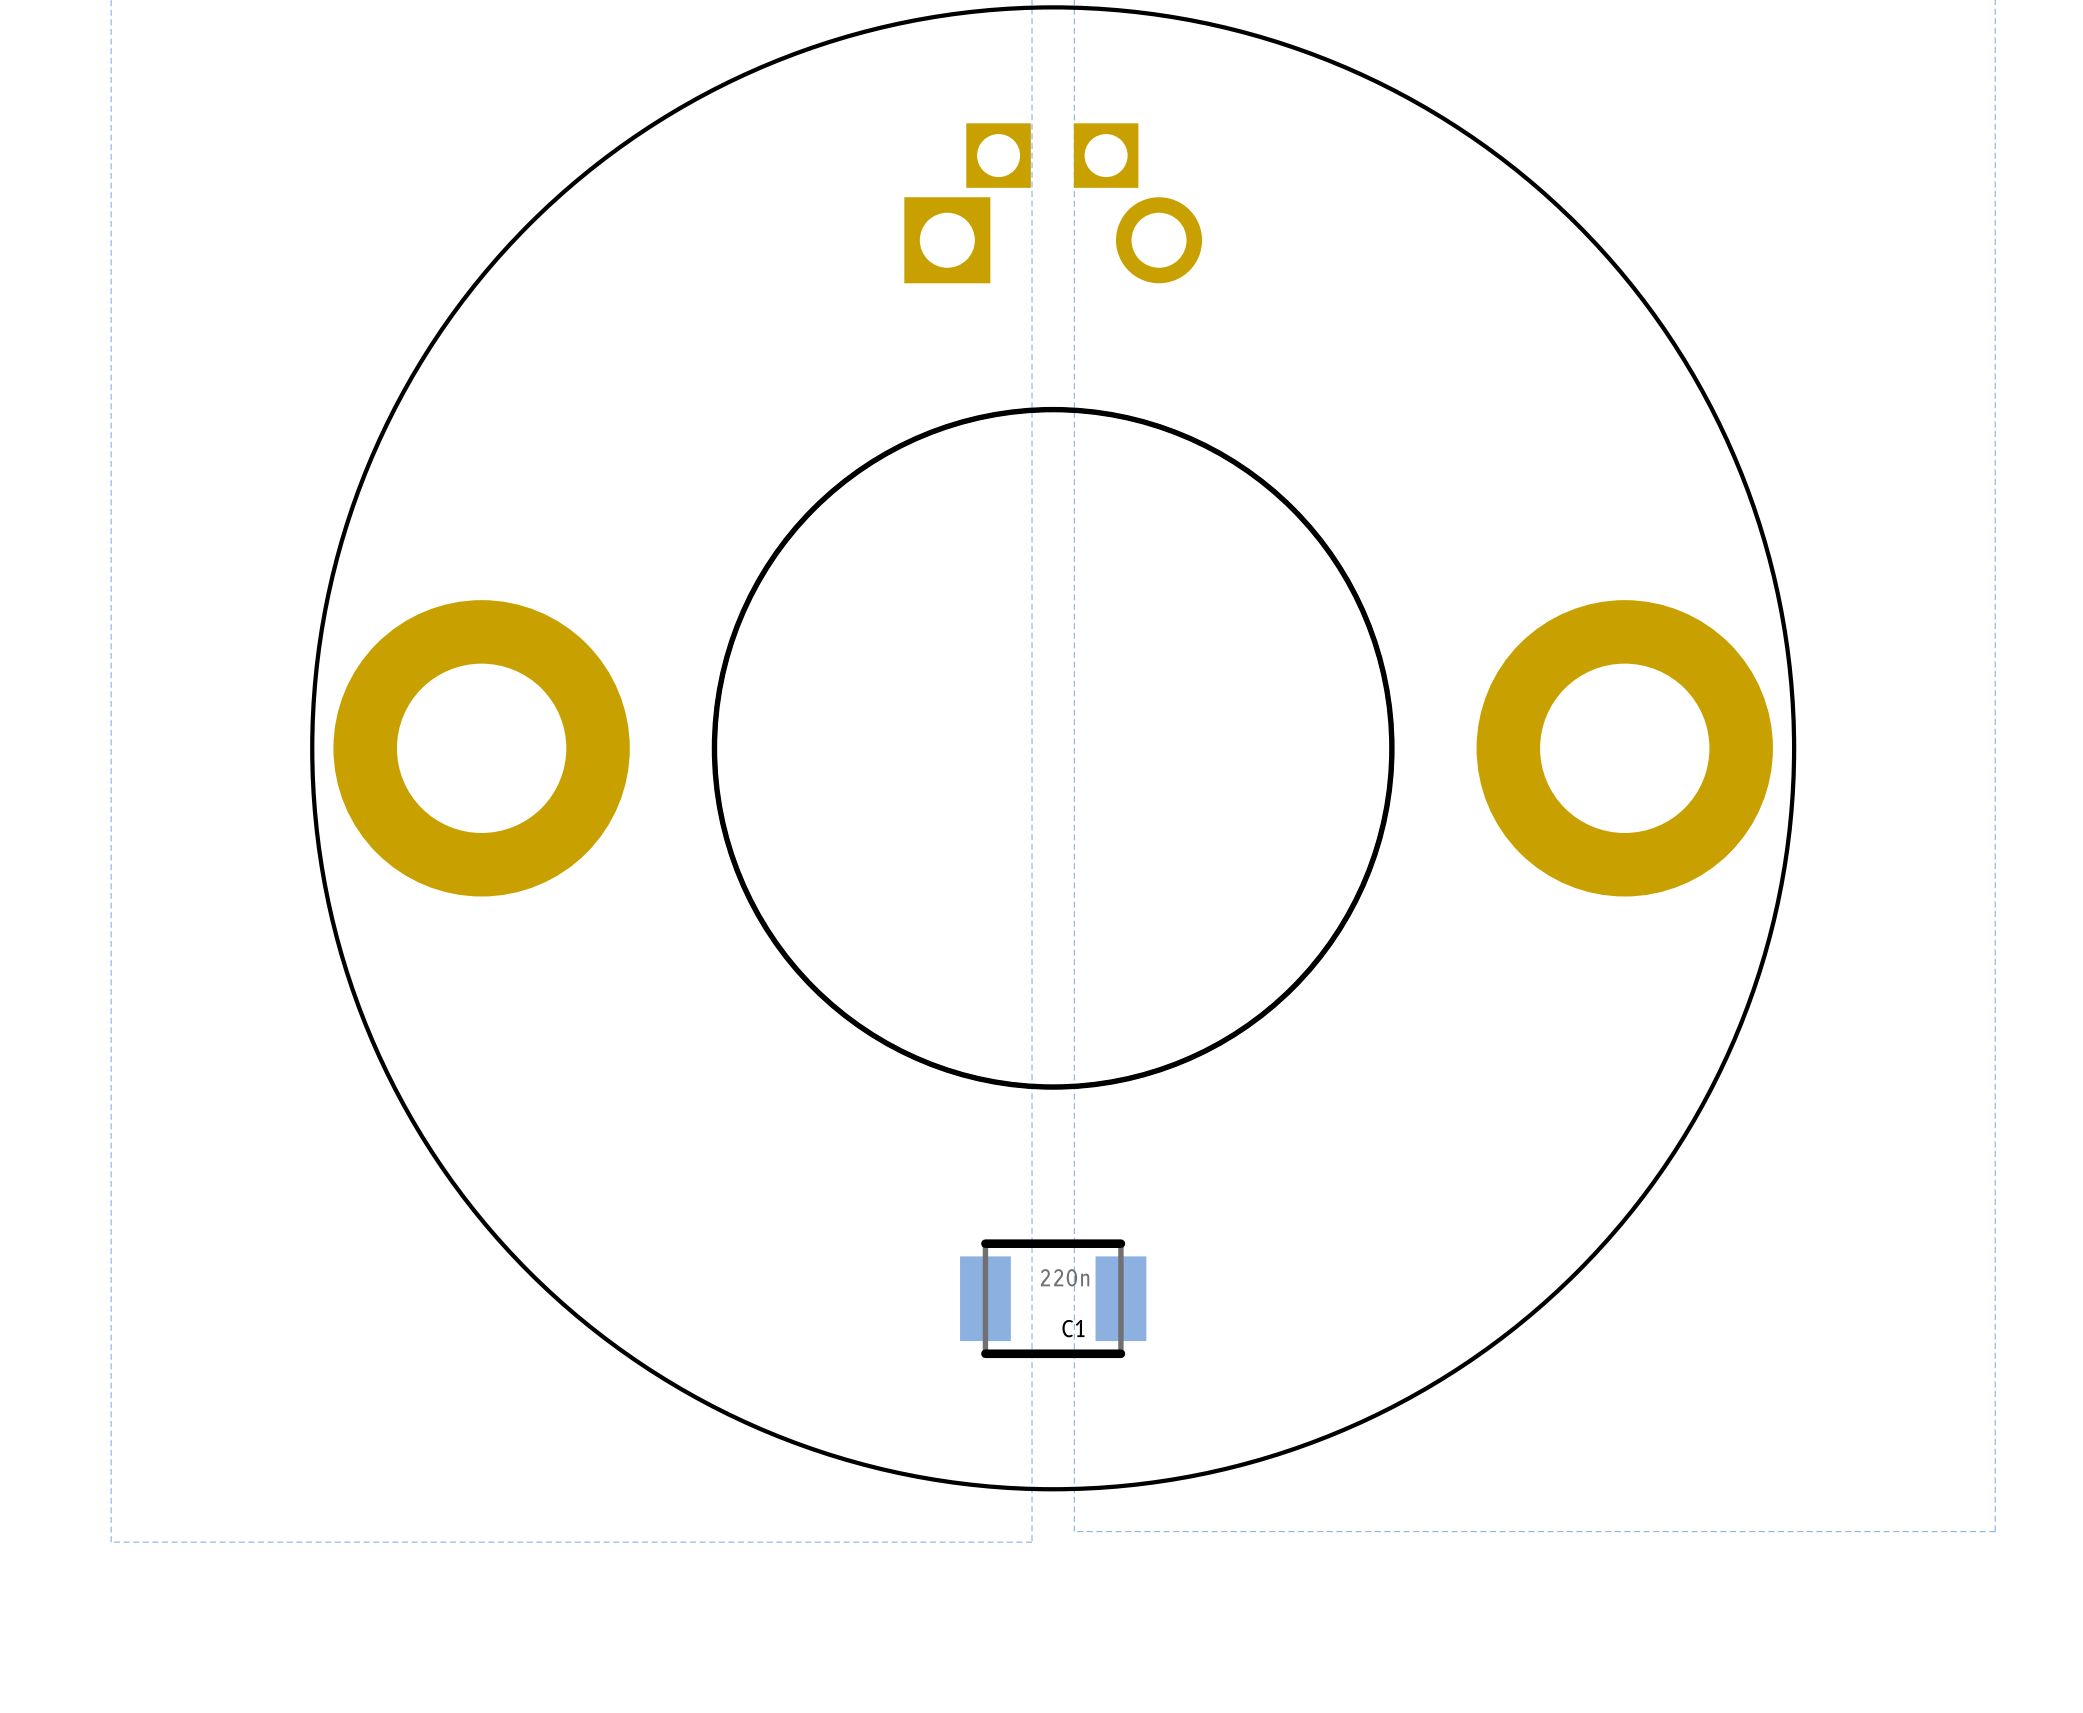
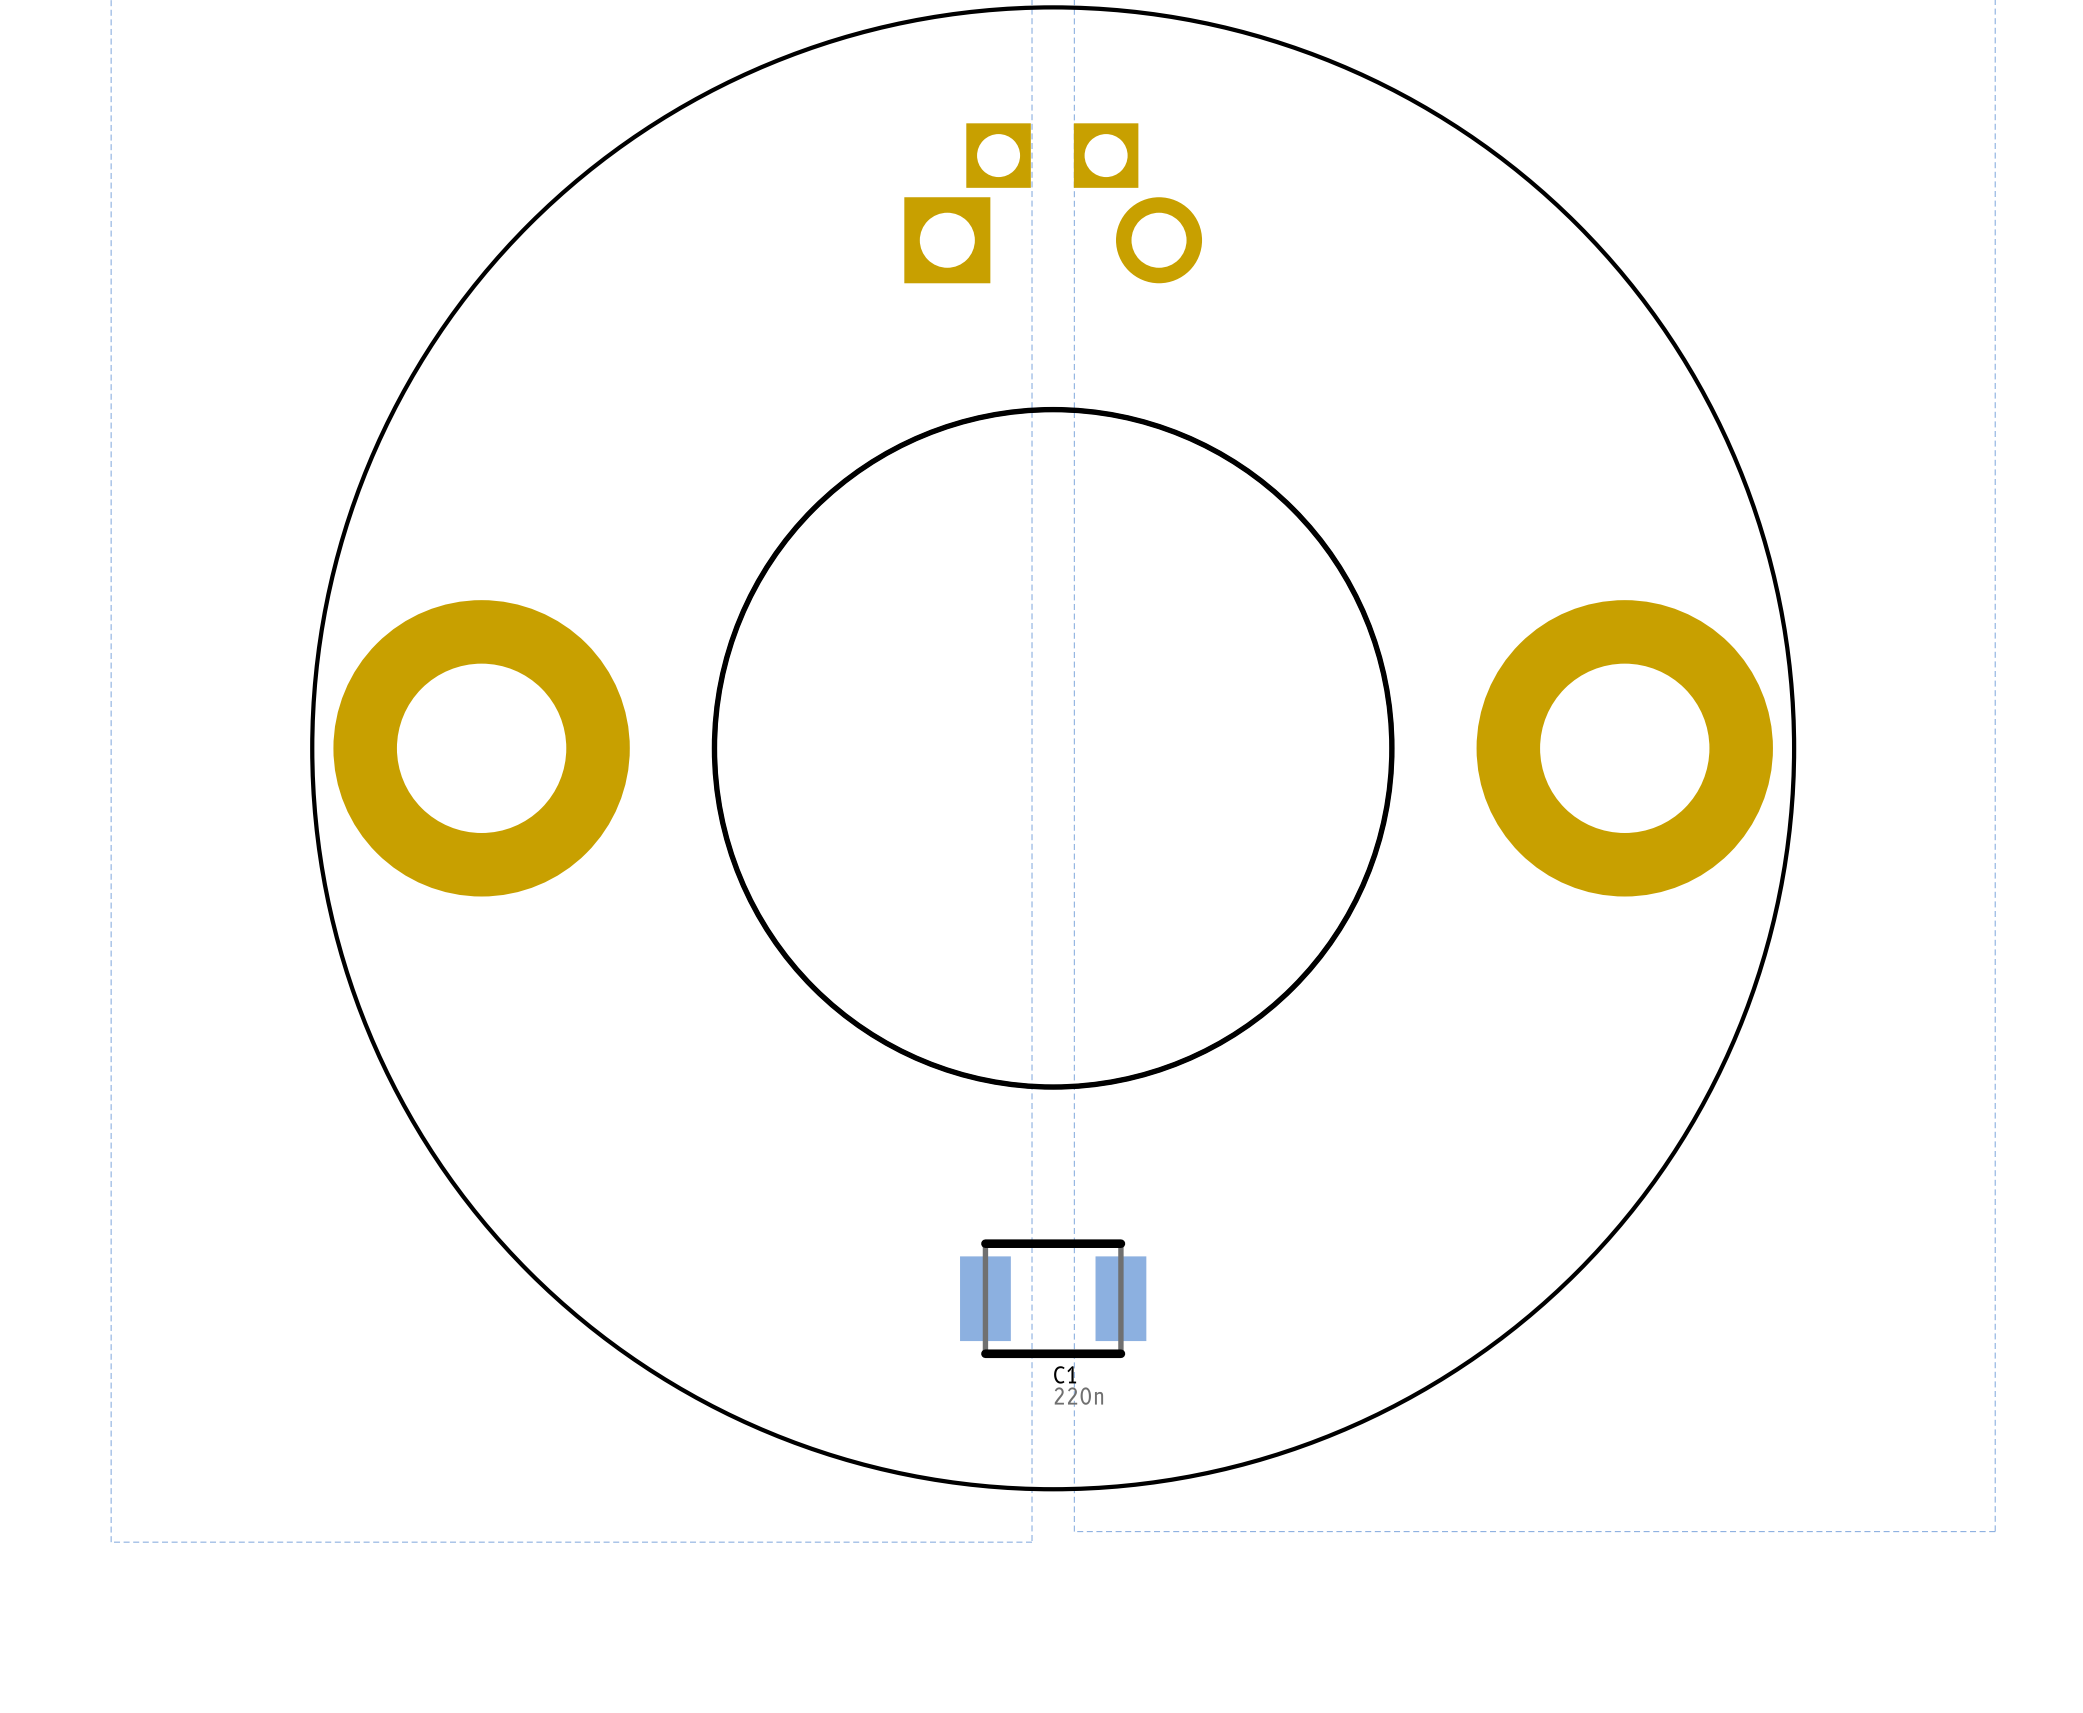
C1 value position: 220n (1065, 1277) -> 220n (1078, 1396)
C1 name position: C1 (1073, 1328) -> C1 (1065, 1374)

